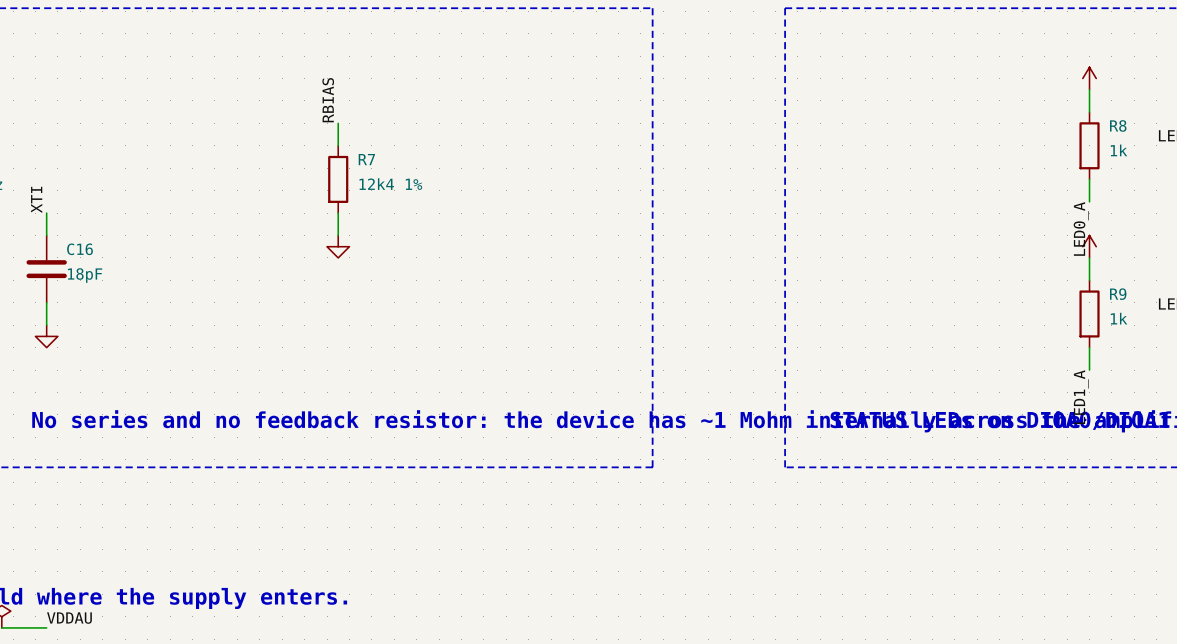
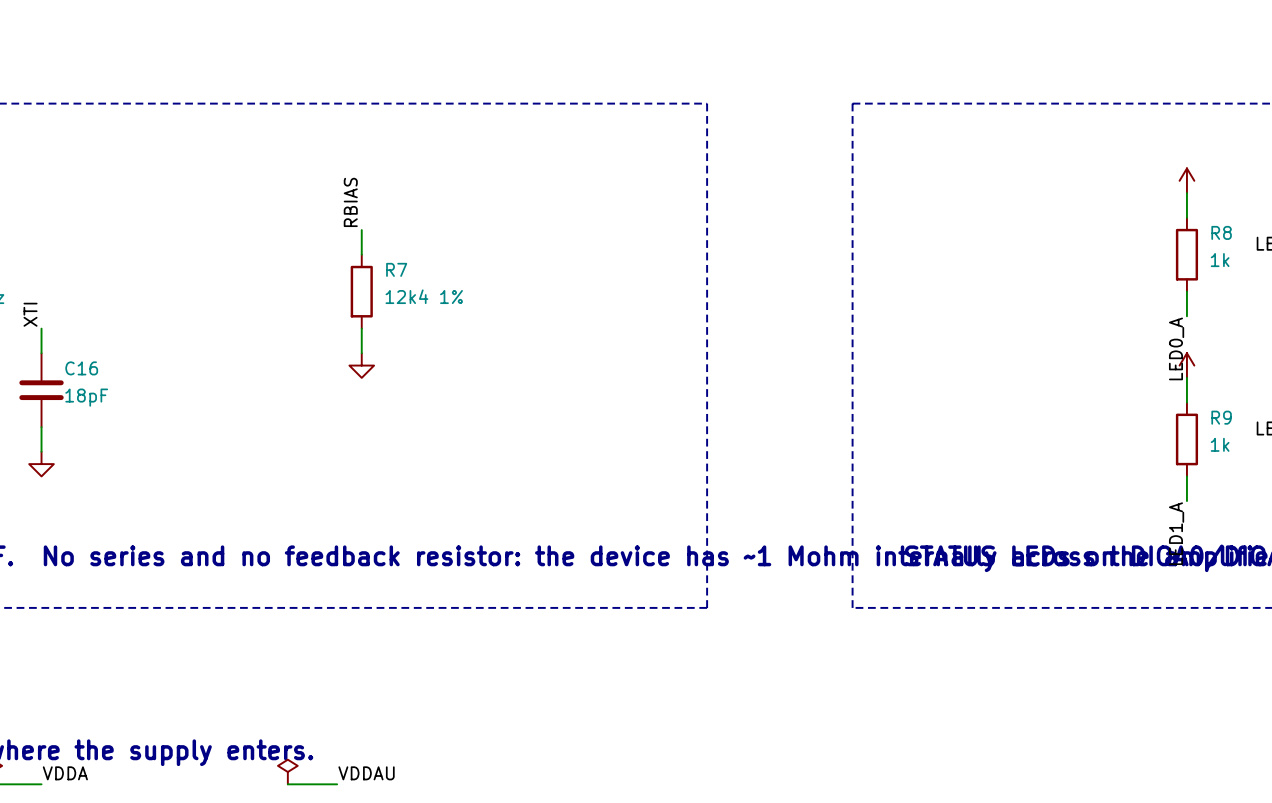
power symbol: none -> (287, 772)
label: VDDAU (69, 618) -> VDDA (65, 773)
label: none -> VDDAU (366, 773)
wire: none -> (287, 784) (337, 784)

